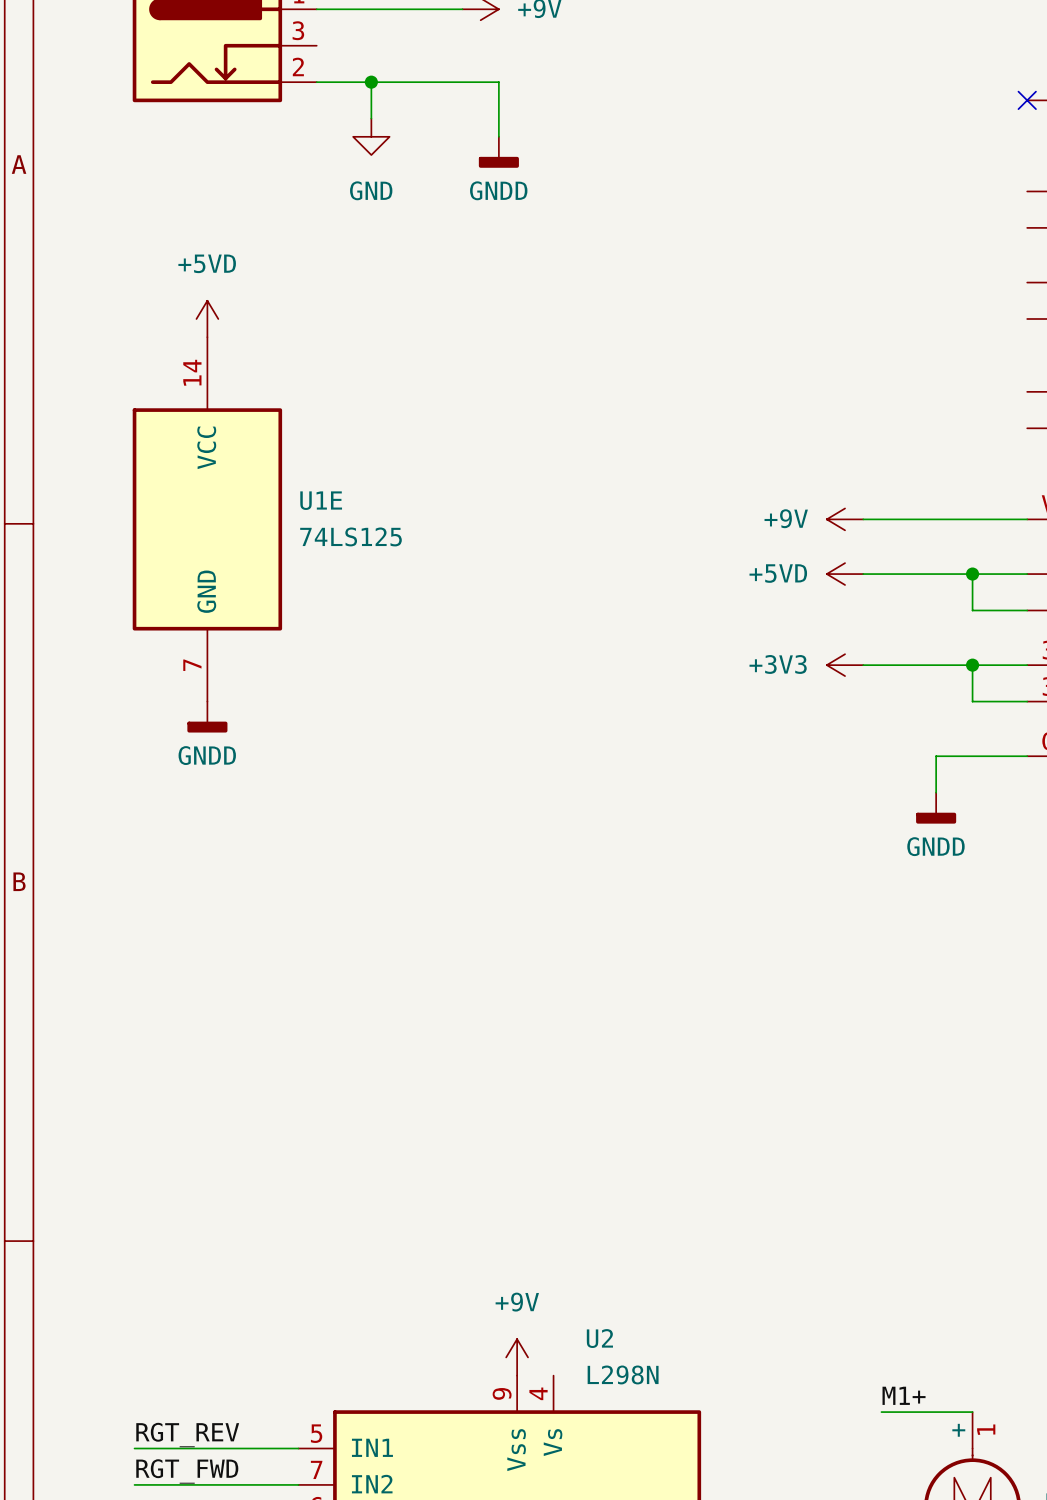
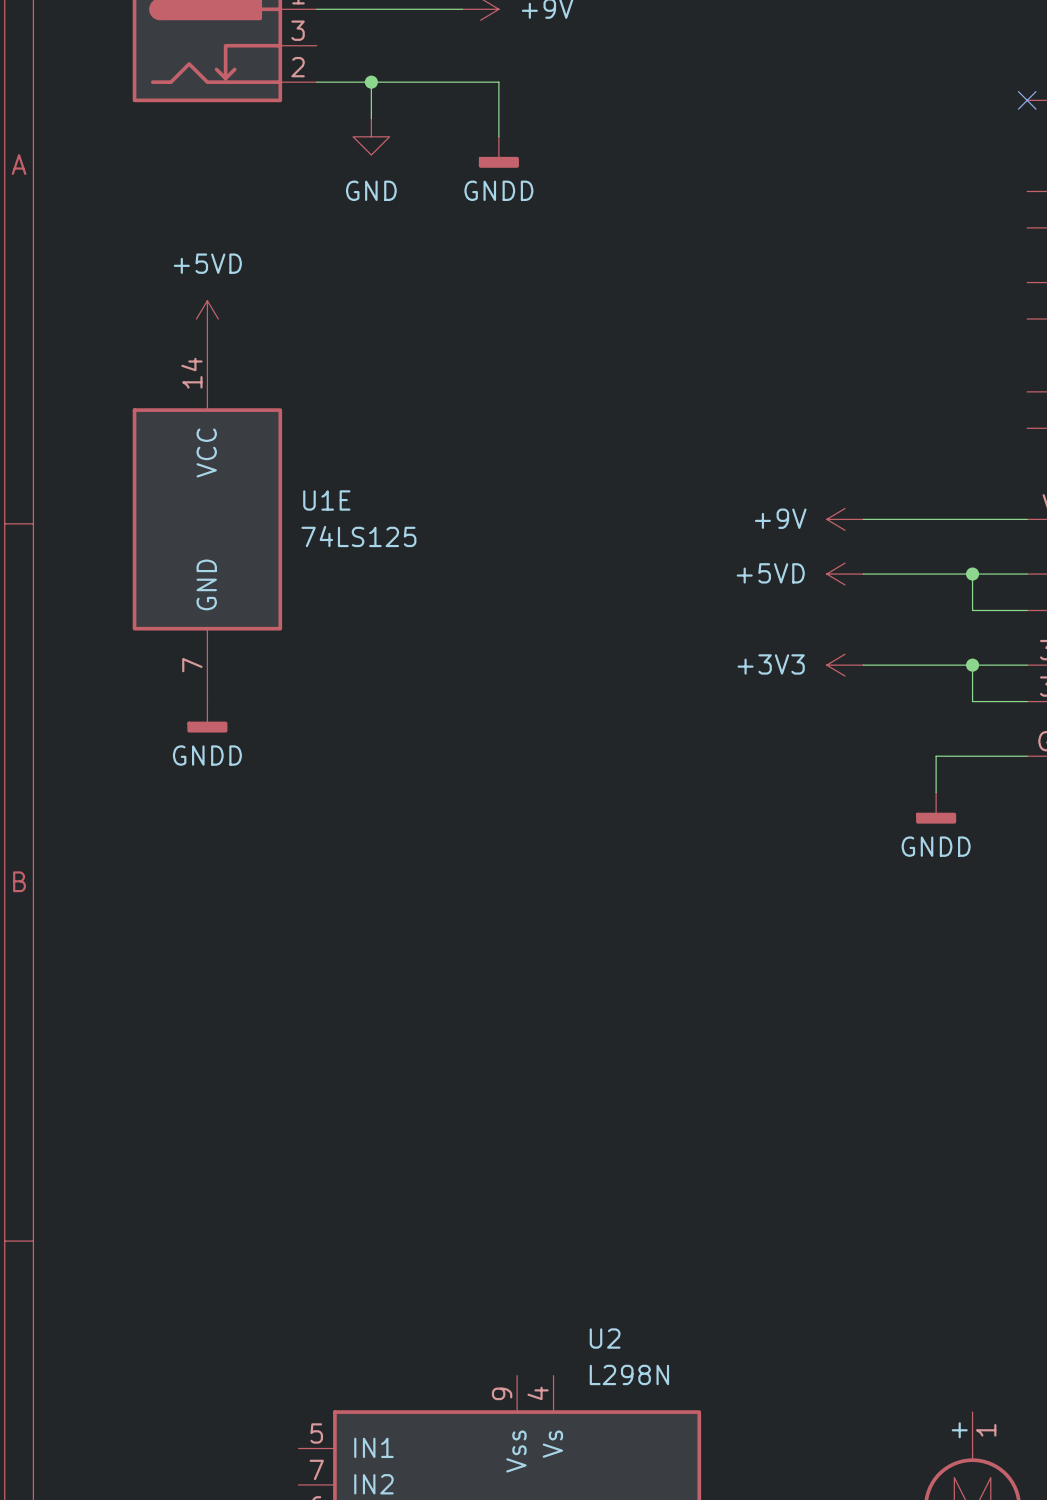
power symbol: +9V (517, 1357) -> none
label: M1+ (904, 1395) -> none
wire: (881, 1412) (972, 1412) -> none
label: RGT_REV (187, 1435) -> none
wire: (134, 1448) (298, 1448) -> none
label: RGT_FWD (187, 1471) -> none
wire: (134, 1484) (298, 1484) -> none

